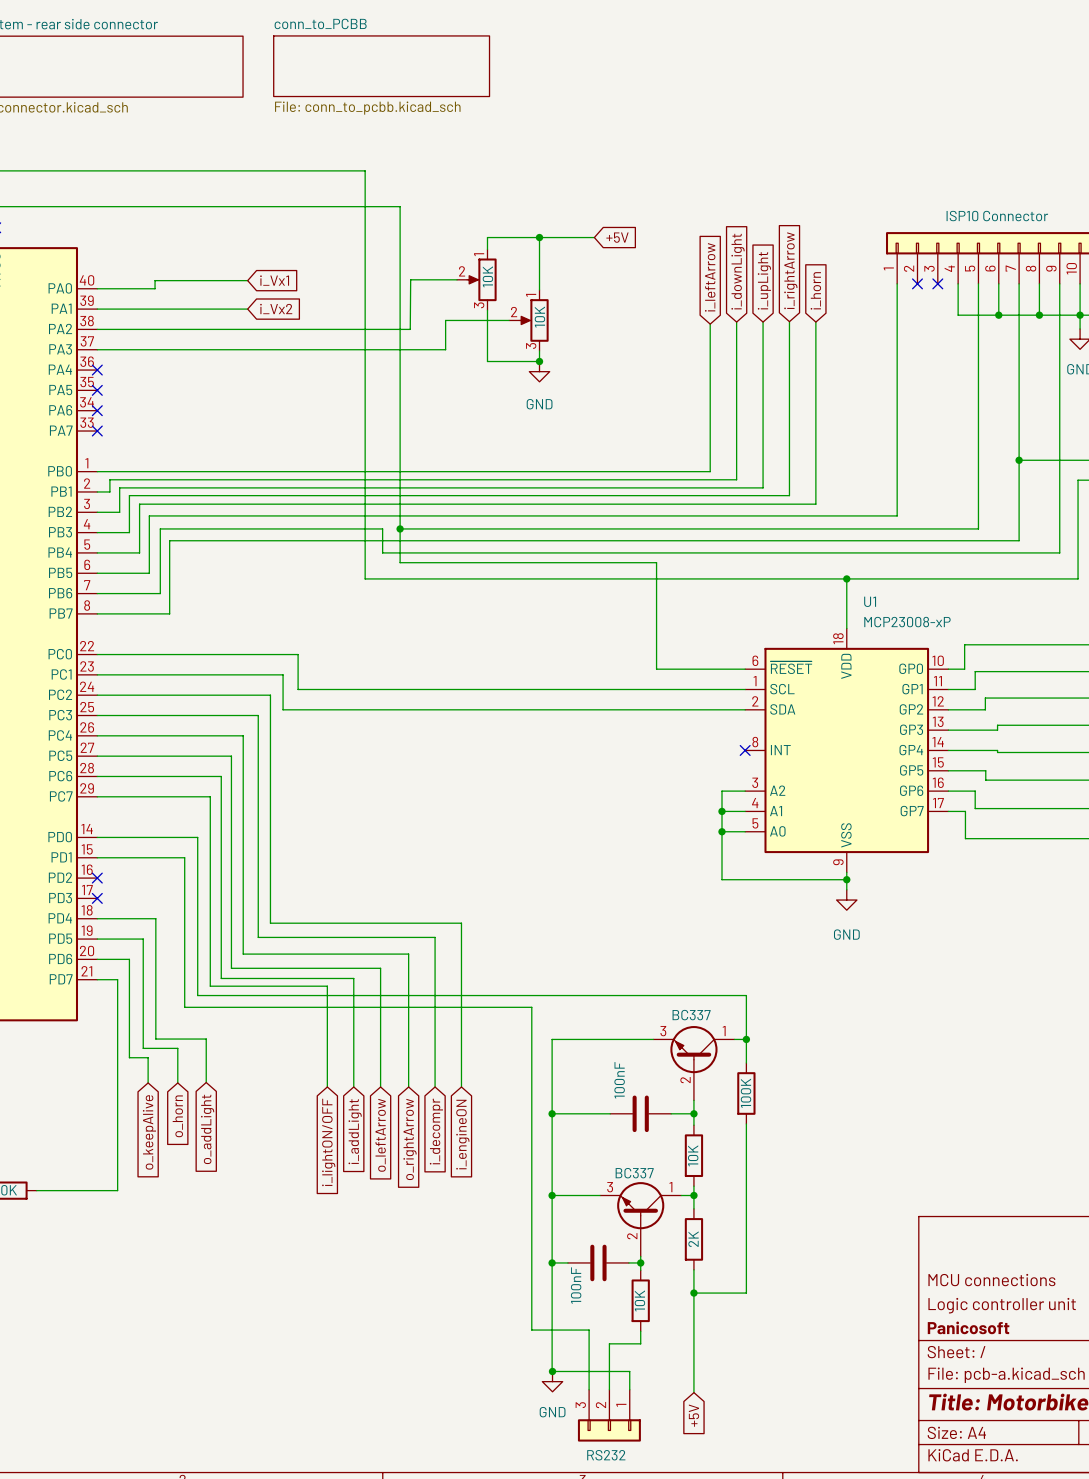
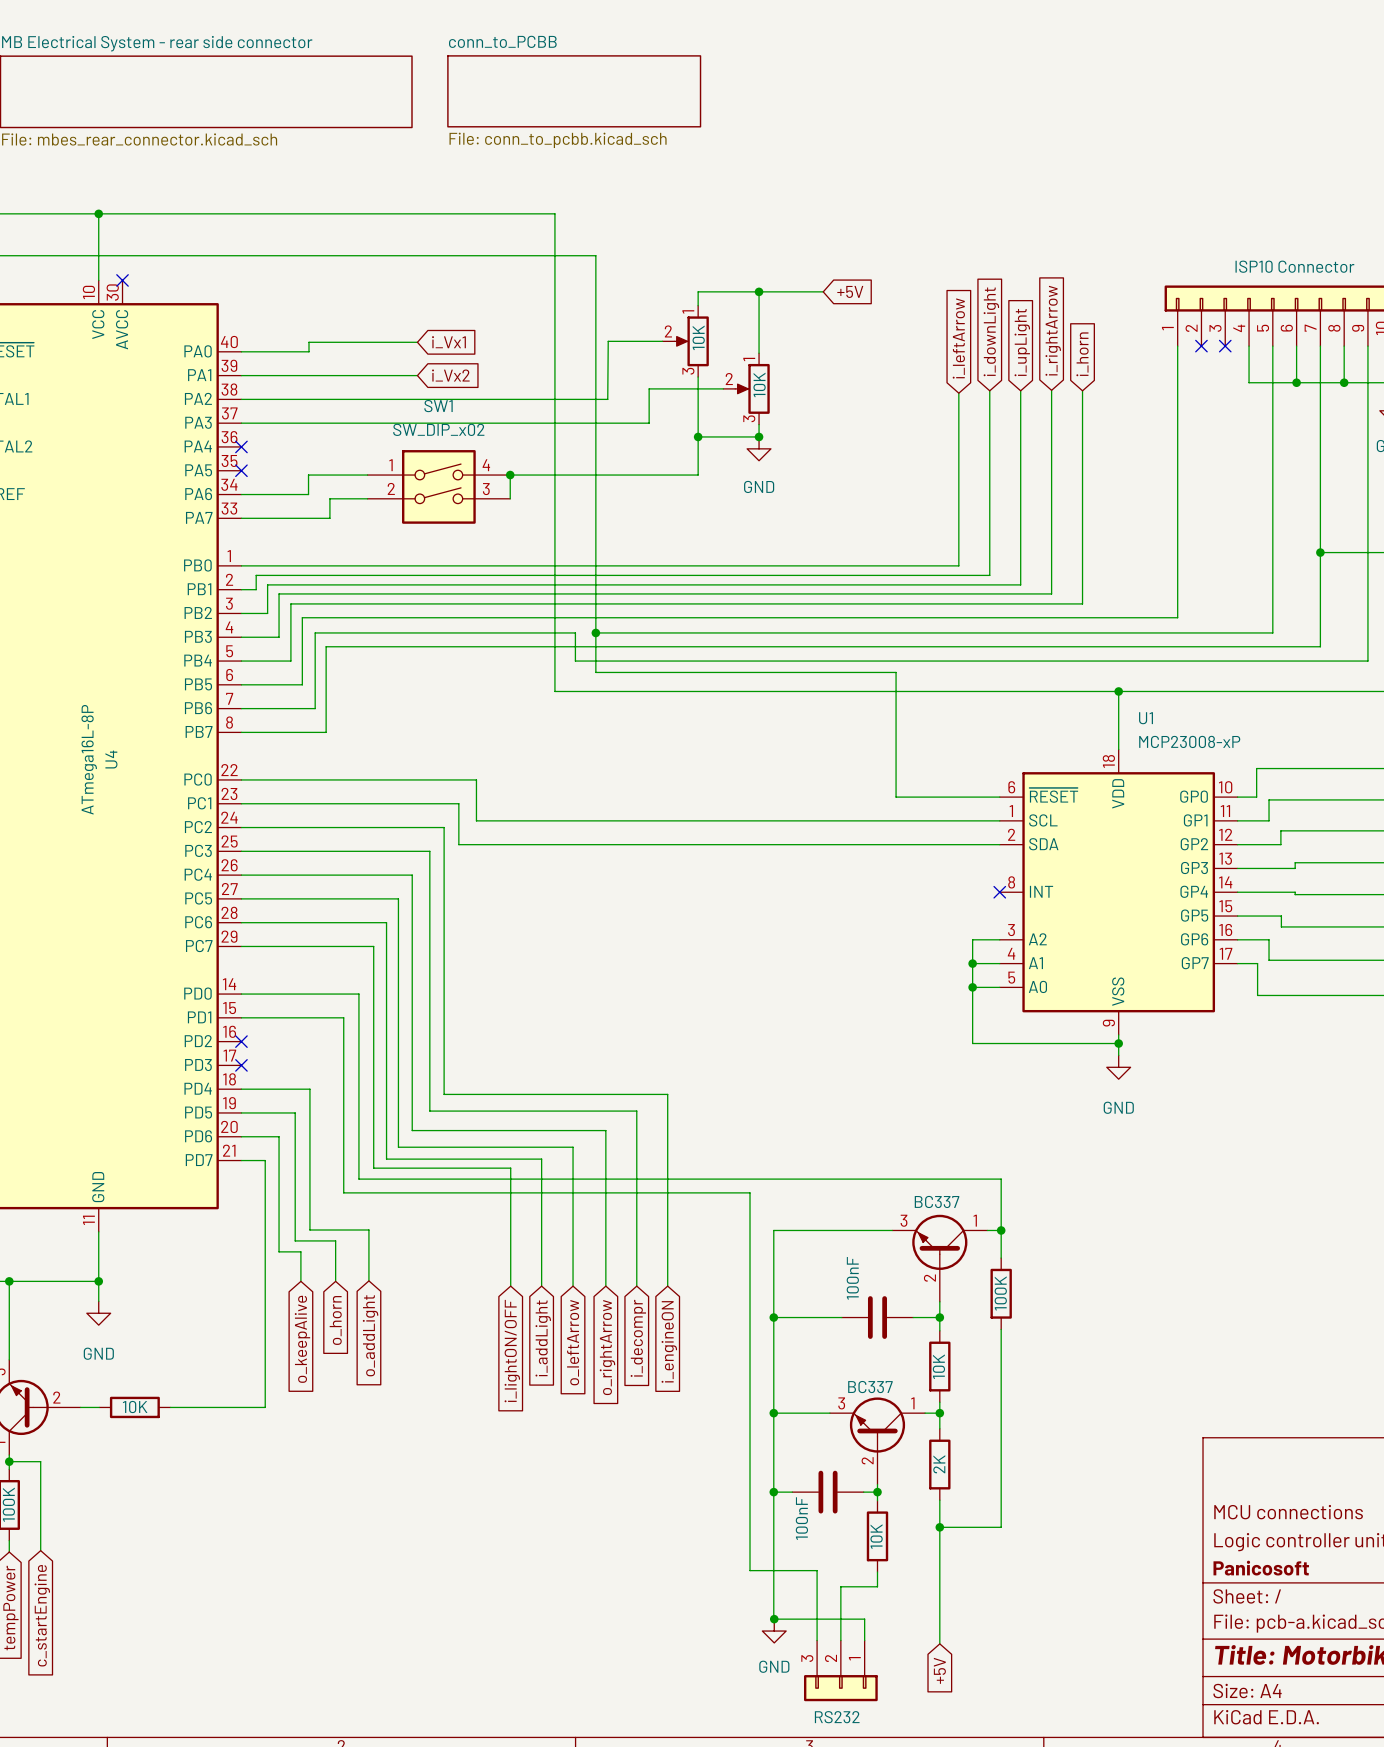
wire: none -> (698, 436) (698, 475) (510, 475) (510, 498)
junction: none -> (698, 436)
wire: none -> (367, 475) (308, 475) (308, 494) (241, 494)
junction: none -> (510, 475)
SW1: none -> SW_DIP_x02 (438, 486)
no-connect mark: (97, 410) -> none
wire: none -> (367, 498) (329, 498) (329, 518) (241, 518)
no-connect mark: (97, 431) -> none

